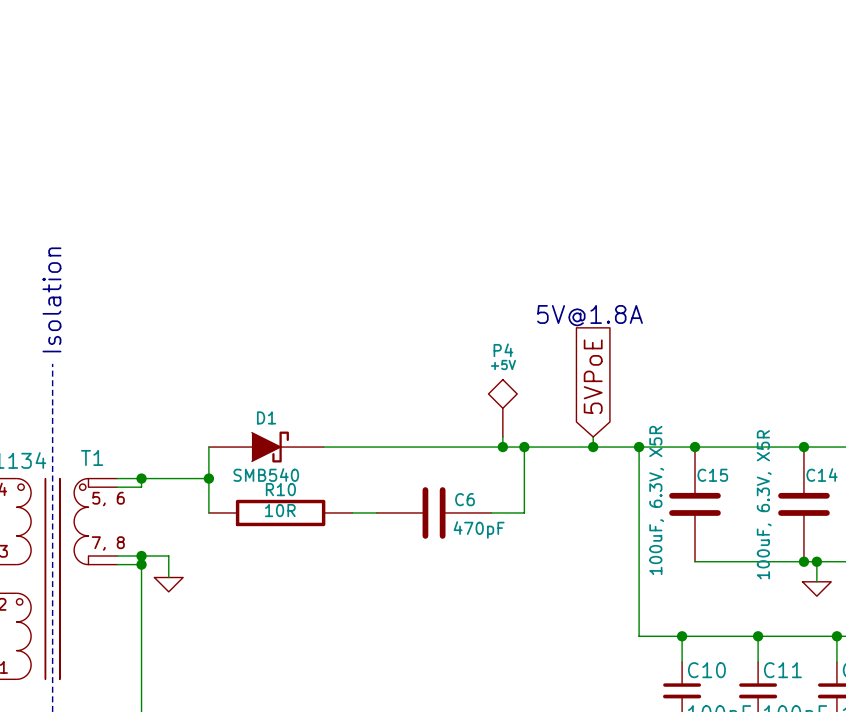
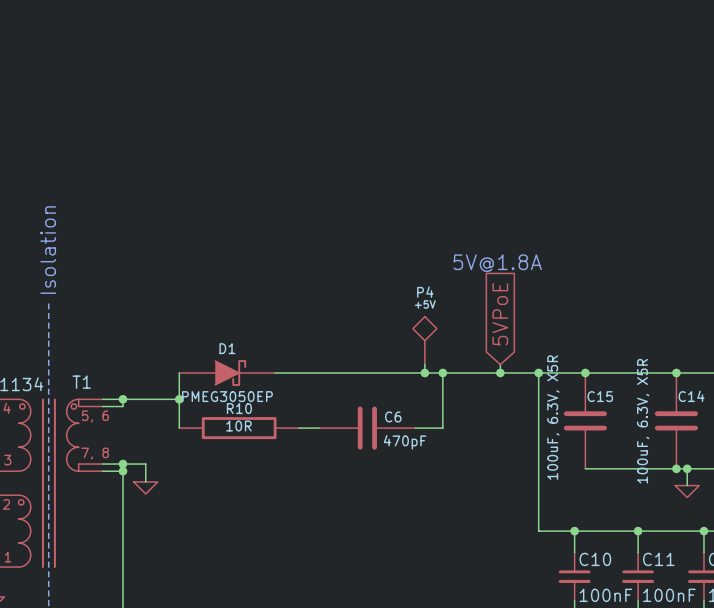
D1 value: SMB540 (266, 475) -> PMEG3050EP (227, 396)

